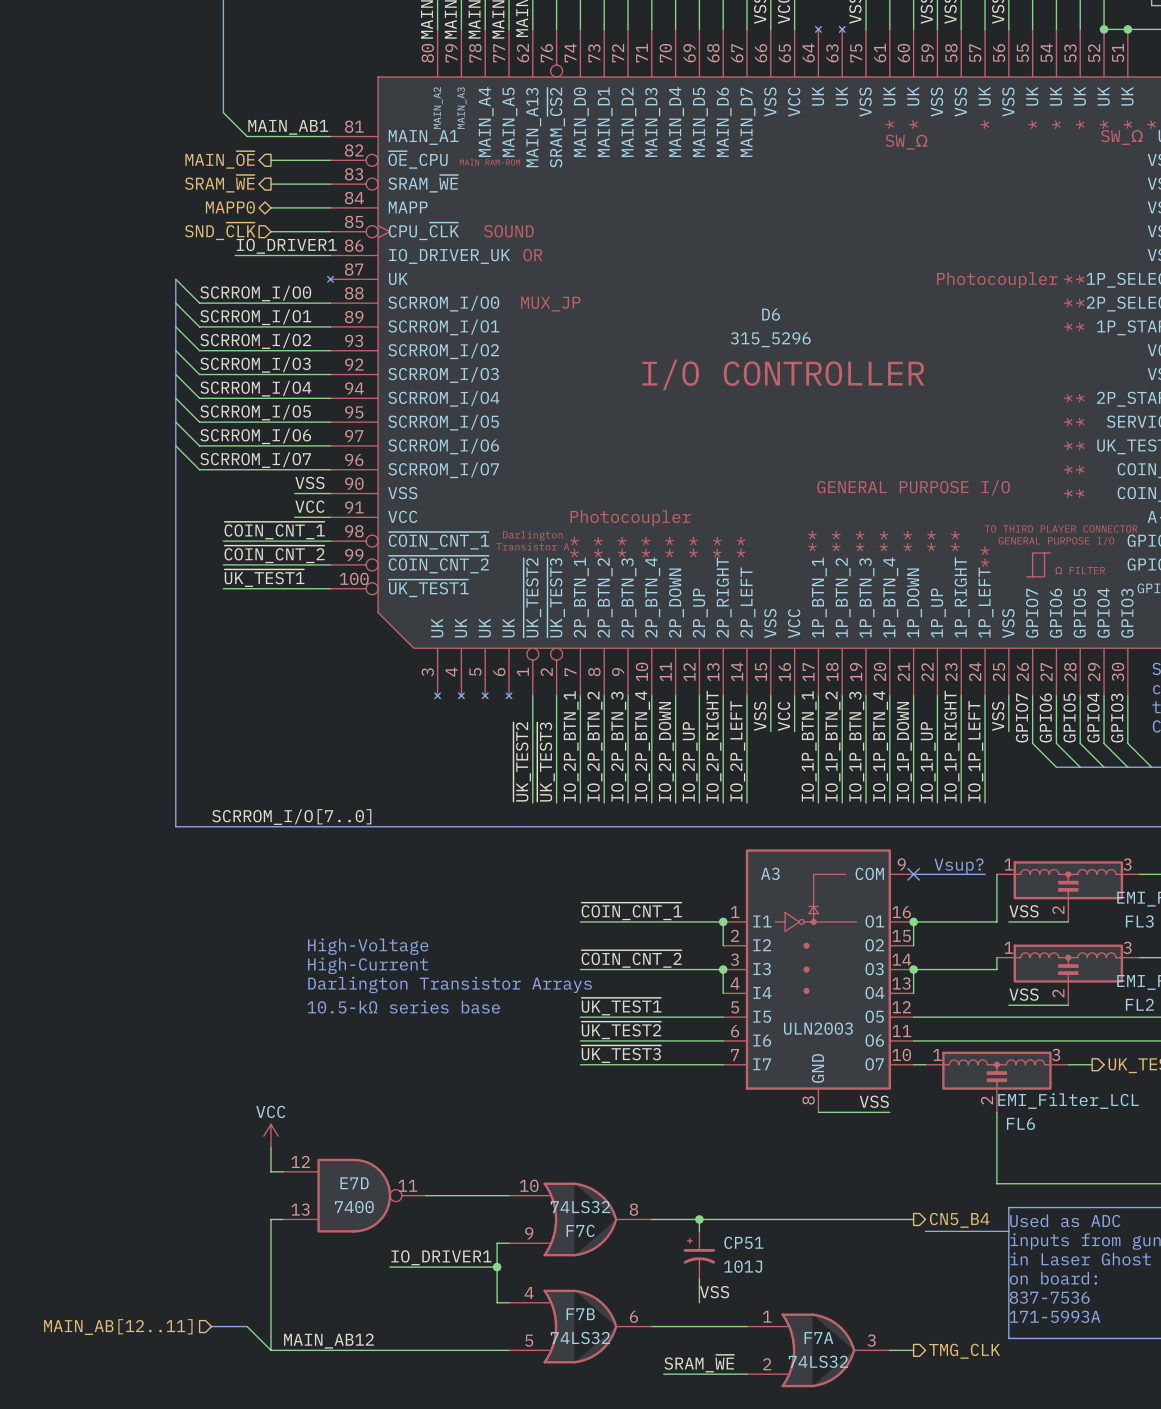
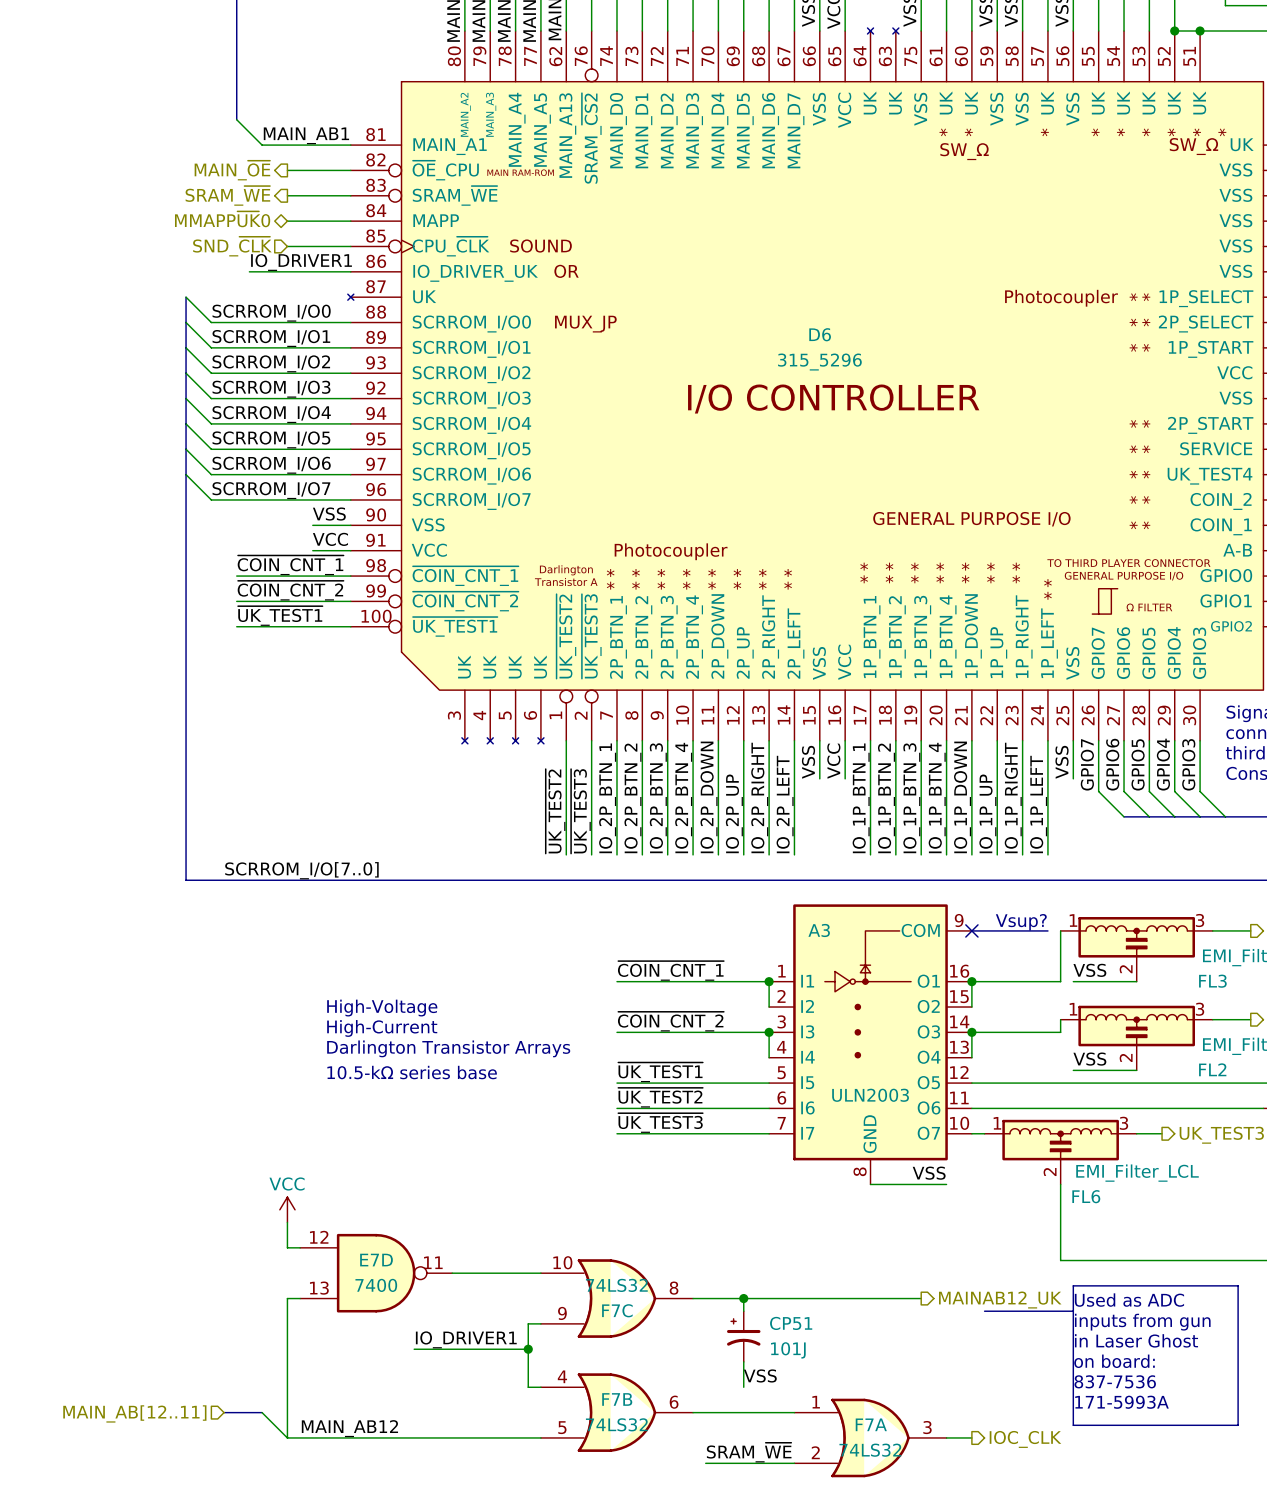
hierarchical label: MAPP0 (230, 207) -> MMAPP~{UK}0 (222, 219)
wire: (866, 1219) (913, 1219) -> none
hierarchical label: none -> MAINAB12_UK (1000, 1300)
hierarchical label: CN5_B4 (959, 1220) -> none
hierarchical label: TMG_CLK (964, 1351) -> IOC_CLK (1025, 1439)

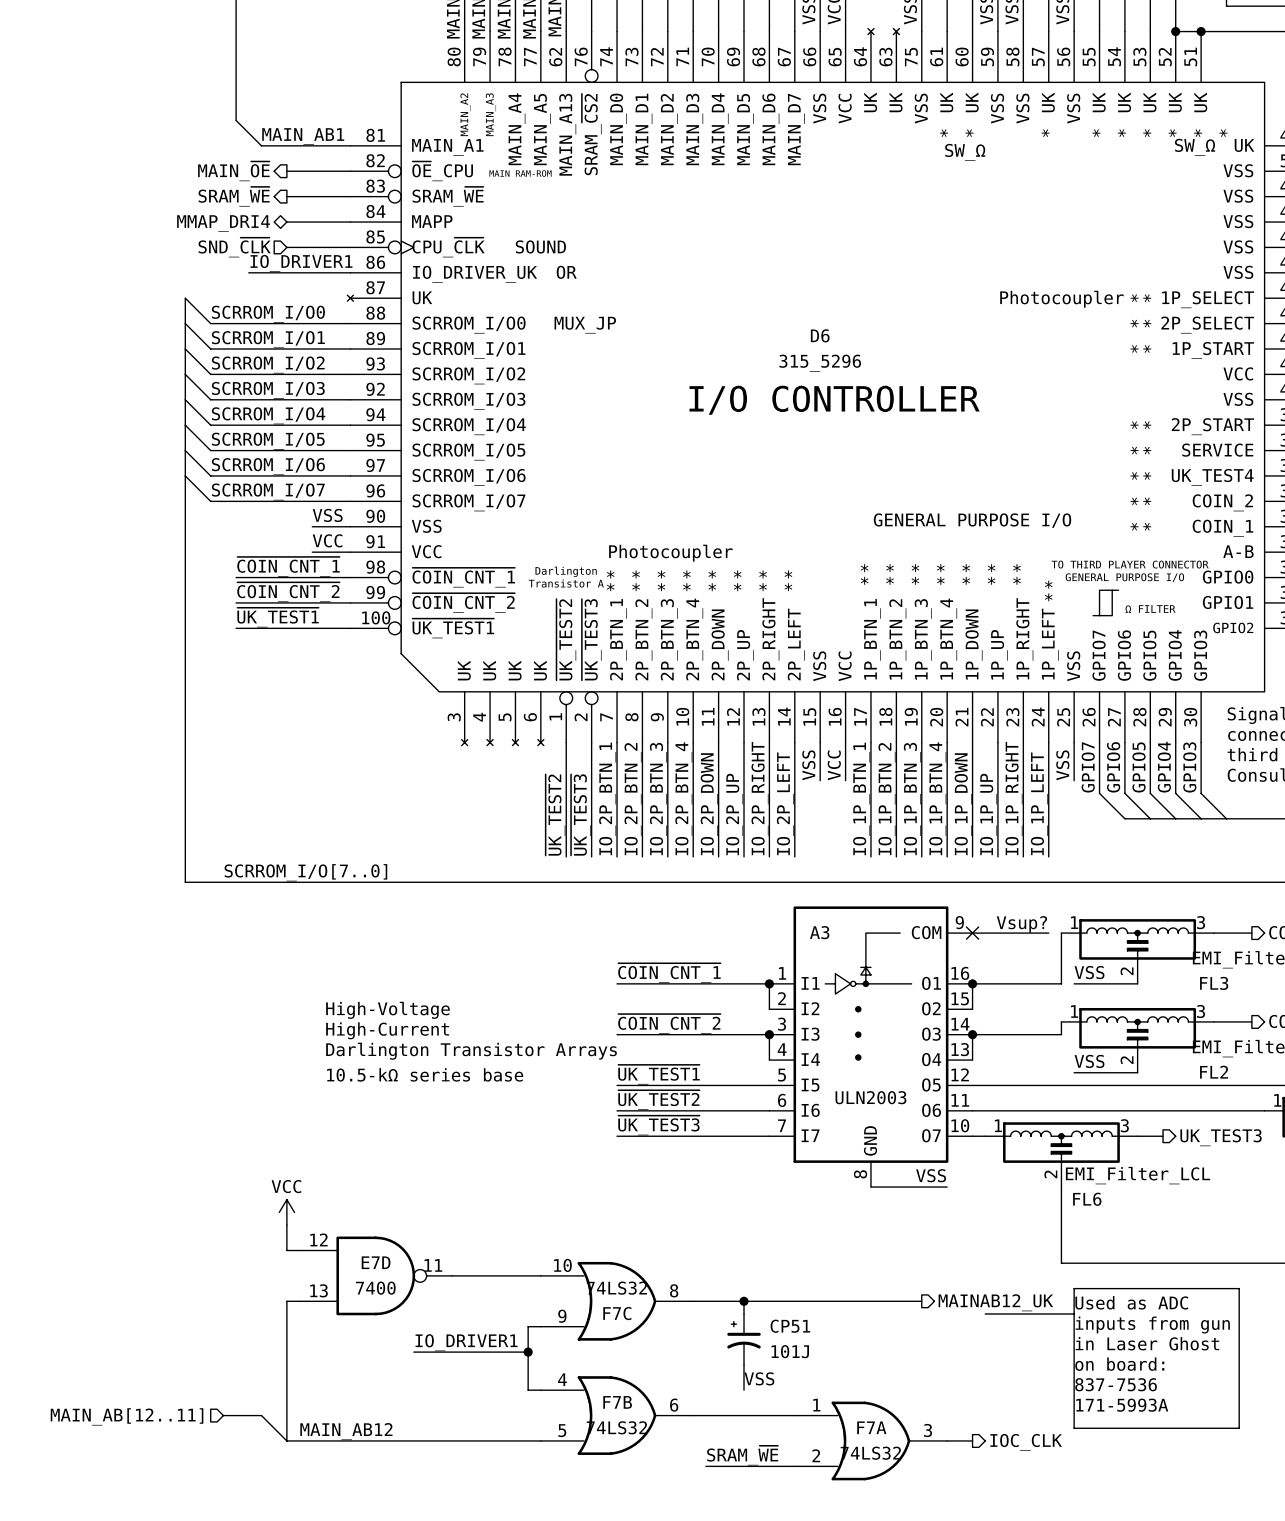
hierarchical label: MMAPP~{UK}0 (222, 219) -> MMAP_DRI4 (223, 223)

